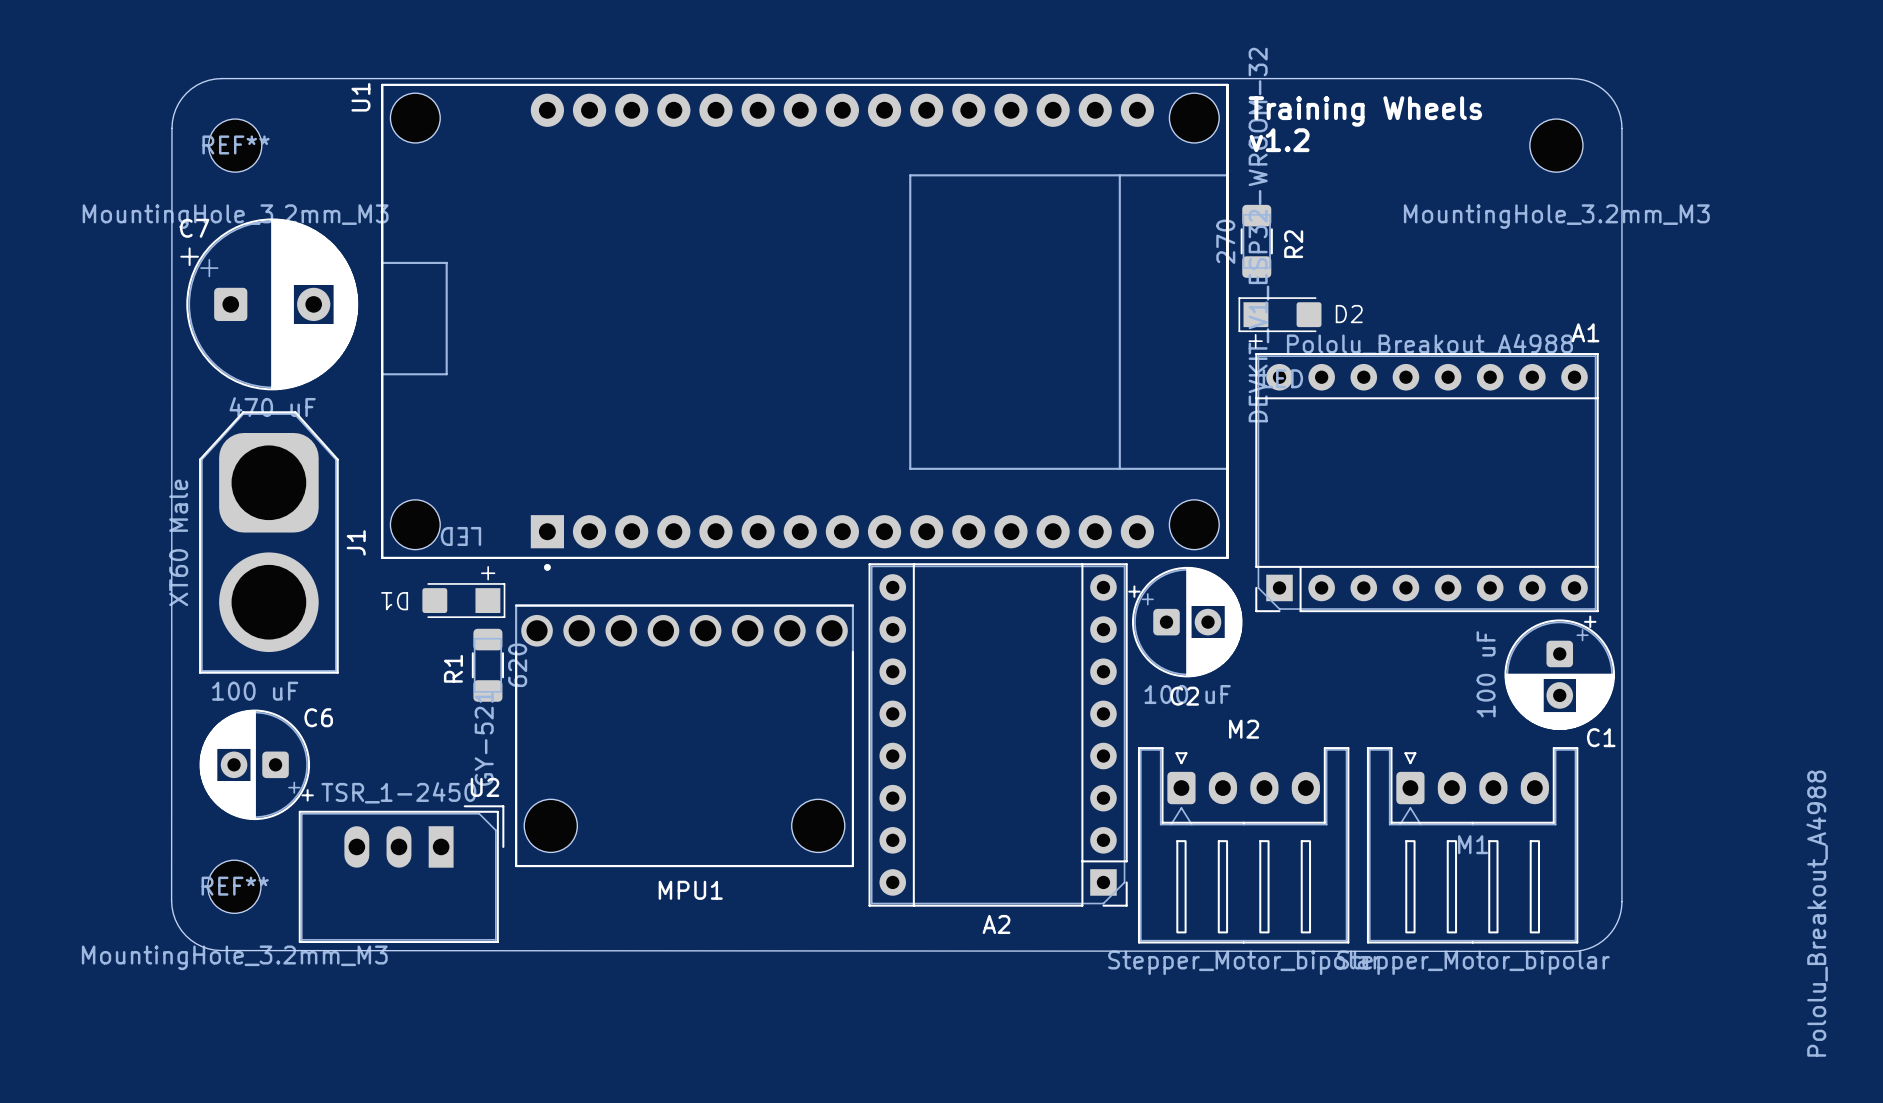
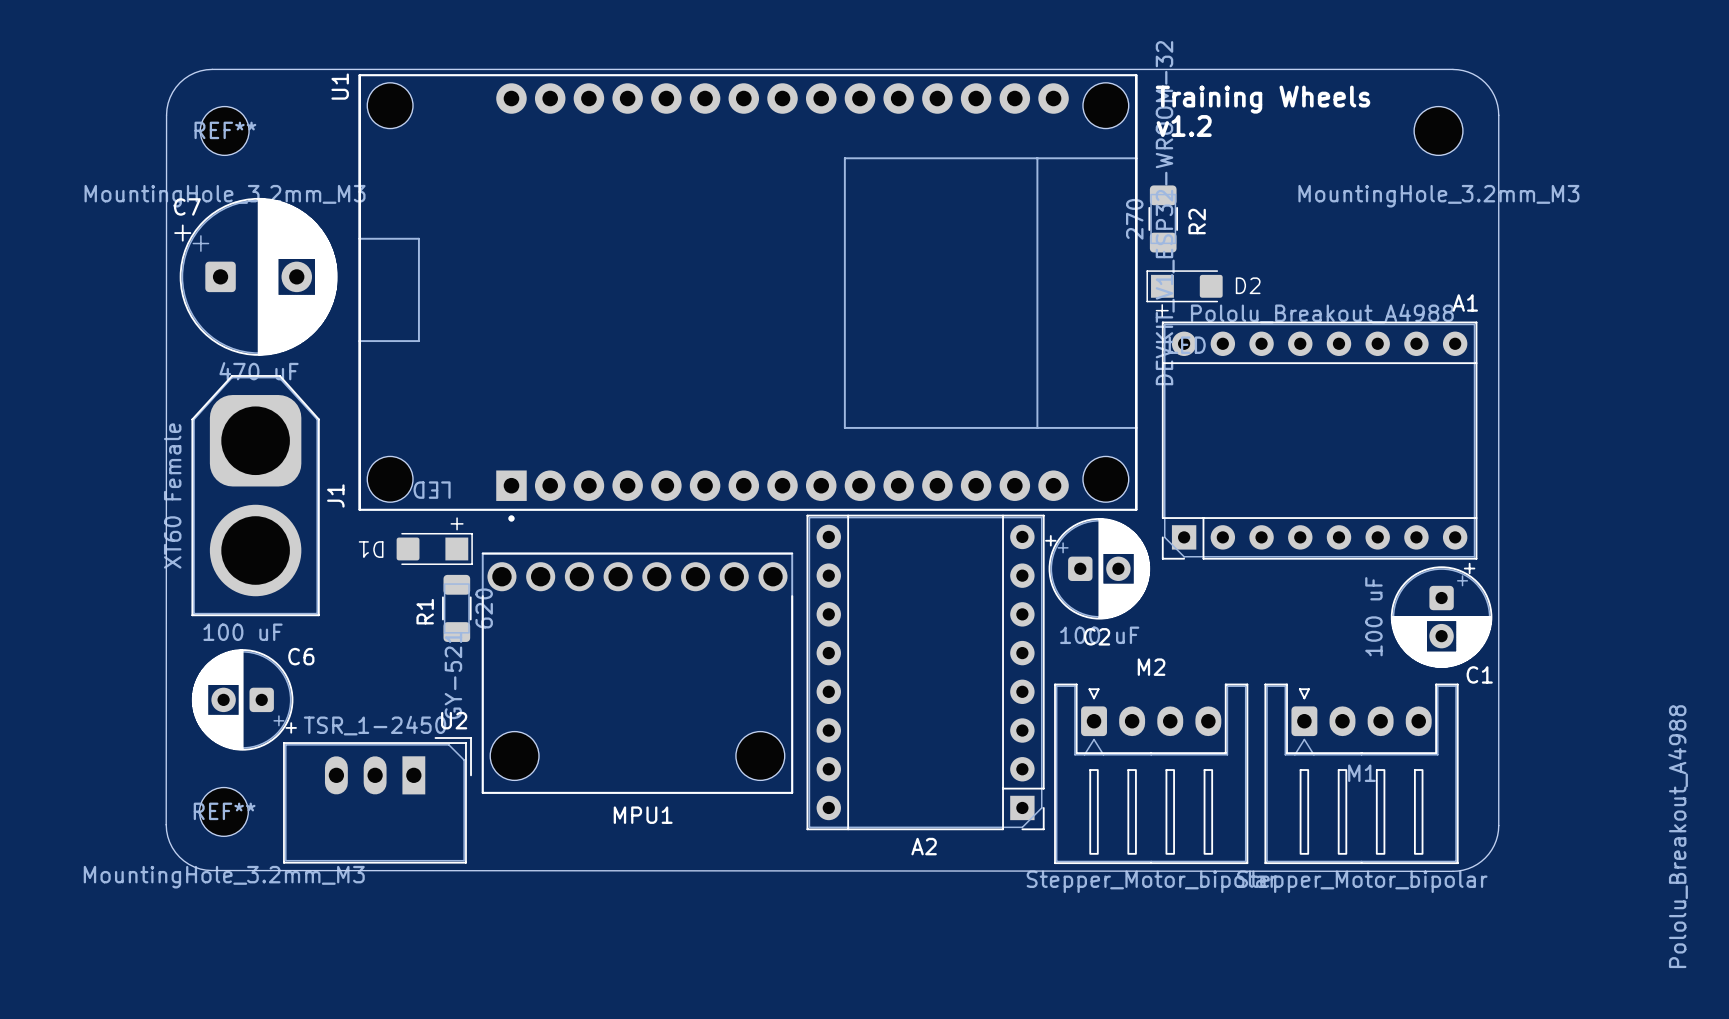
J1 value: XT60 Male (178, 542) -> XT60 Female (172, 495)

